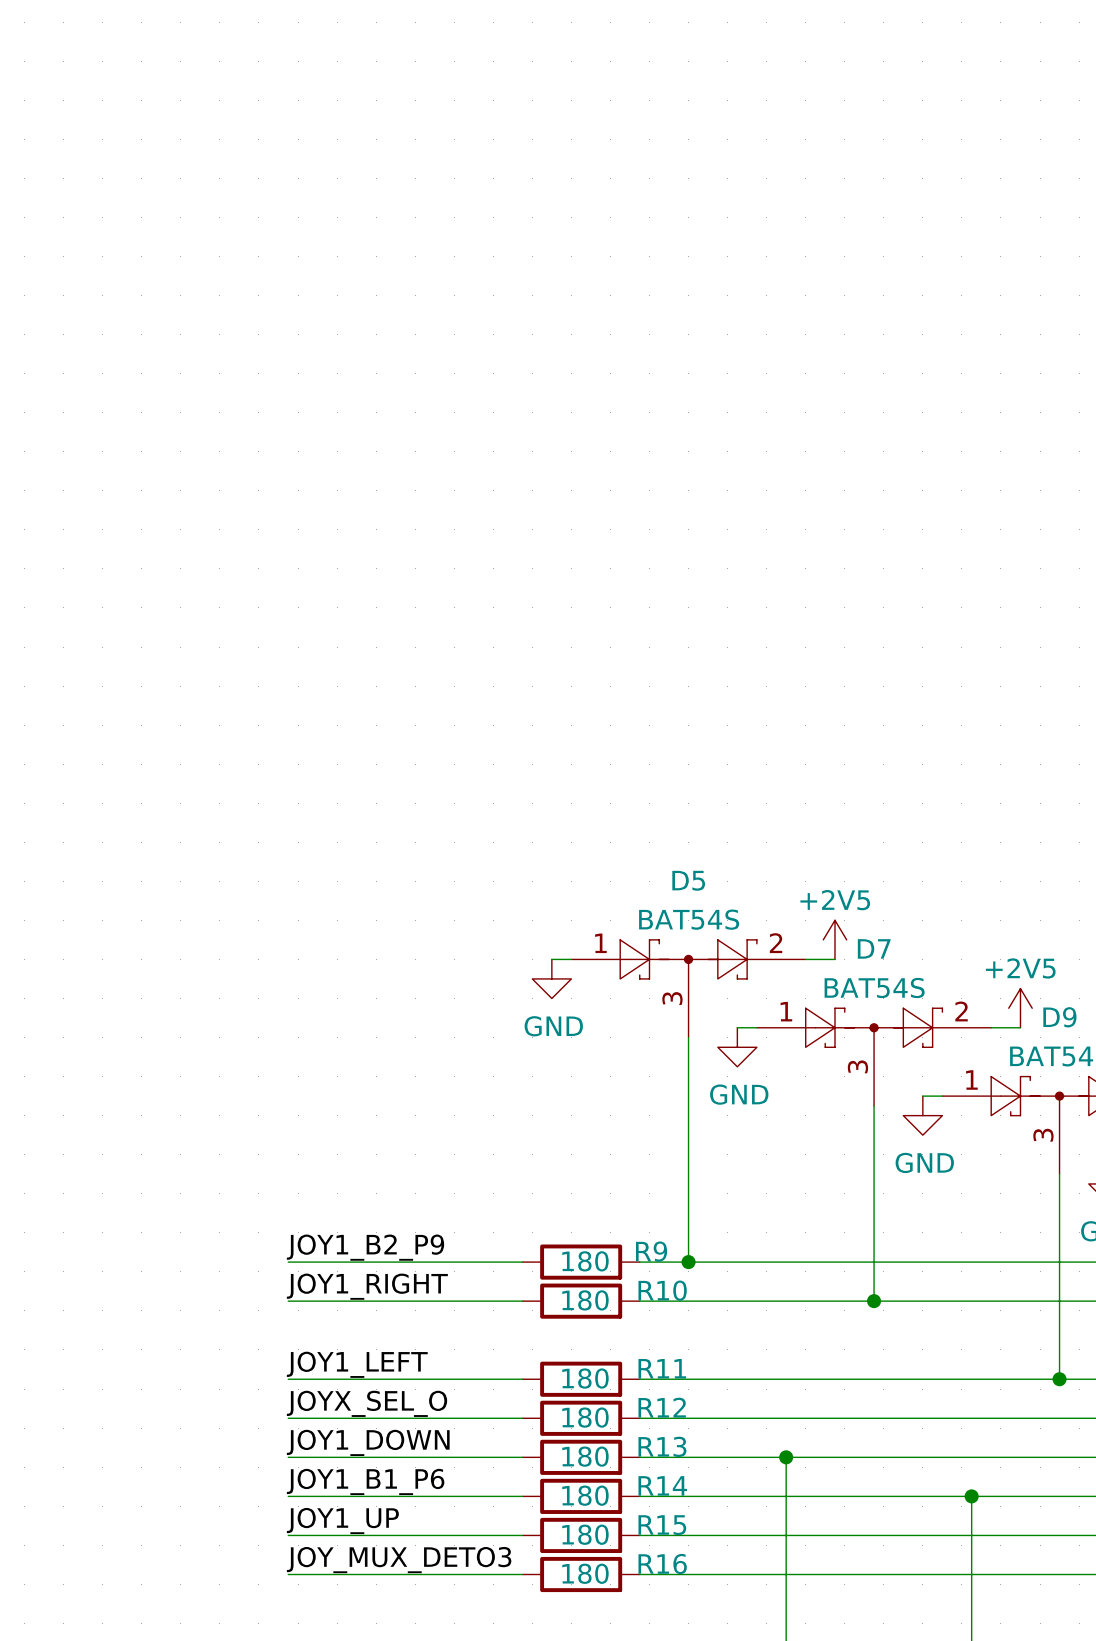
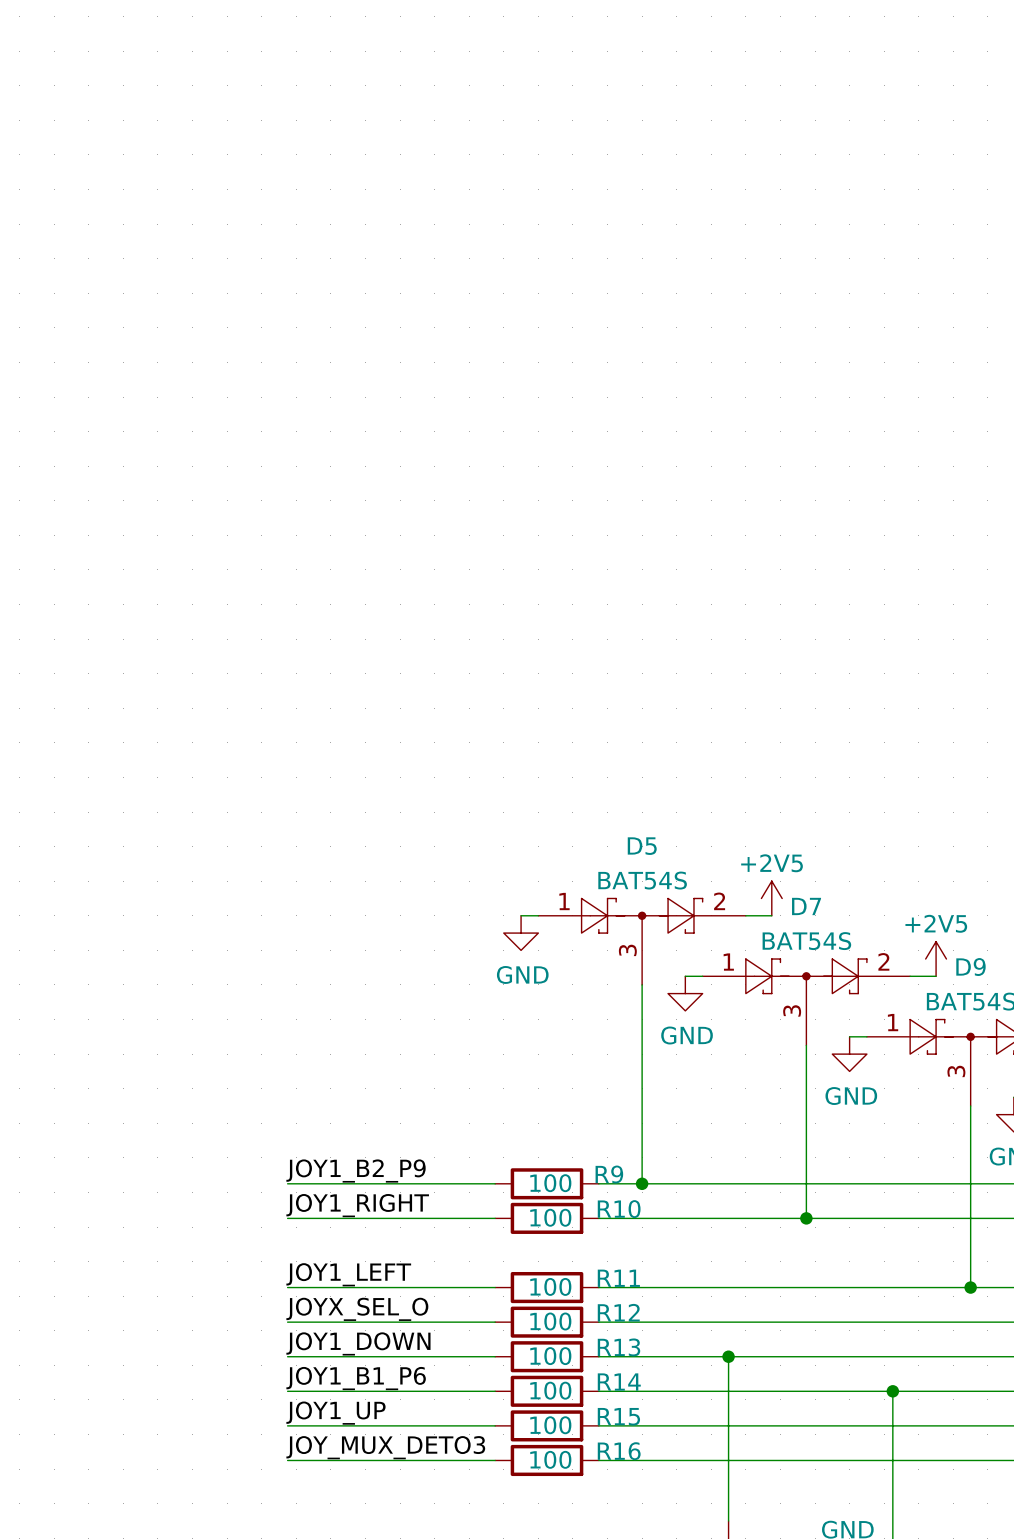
R9 value: 180 (585, 1261) -> 100 (550, 1183)
R10 value: 180 (585, 1300) -> 100 (550, 1217)
R11 value: 180 (585, 1378) -> 100 (550, 1286)
R12 value: 180 (585, 1417) -> 100 (550, 1321)
R13 value: 180 (585, 1456) -> 100 (550, 1356)
R14 value: 180 (585, 1495) -> 100 (550, 1390)
R15 value: 180 (585, 1534) -> 100 (550, 1425)
R16 value: 180 (585, 1573) -> 100 (550, 1459)

